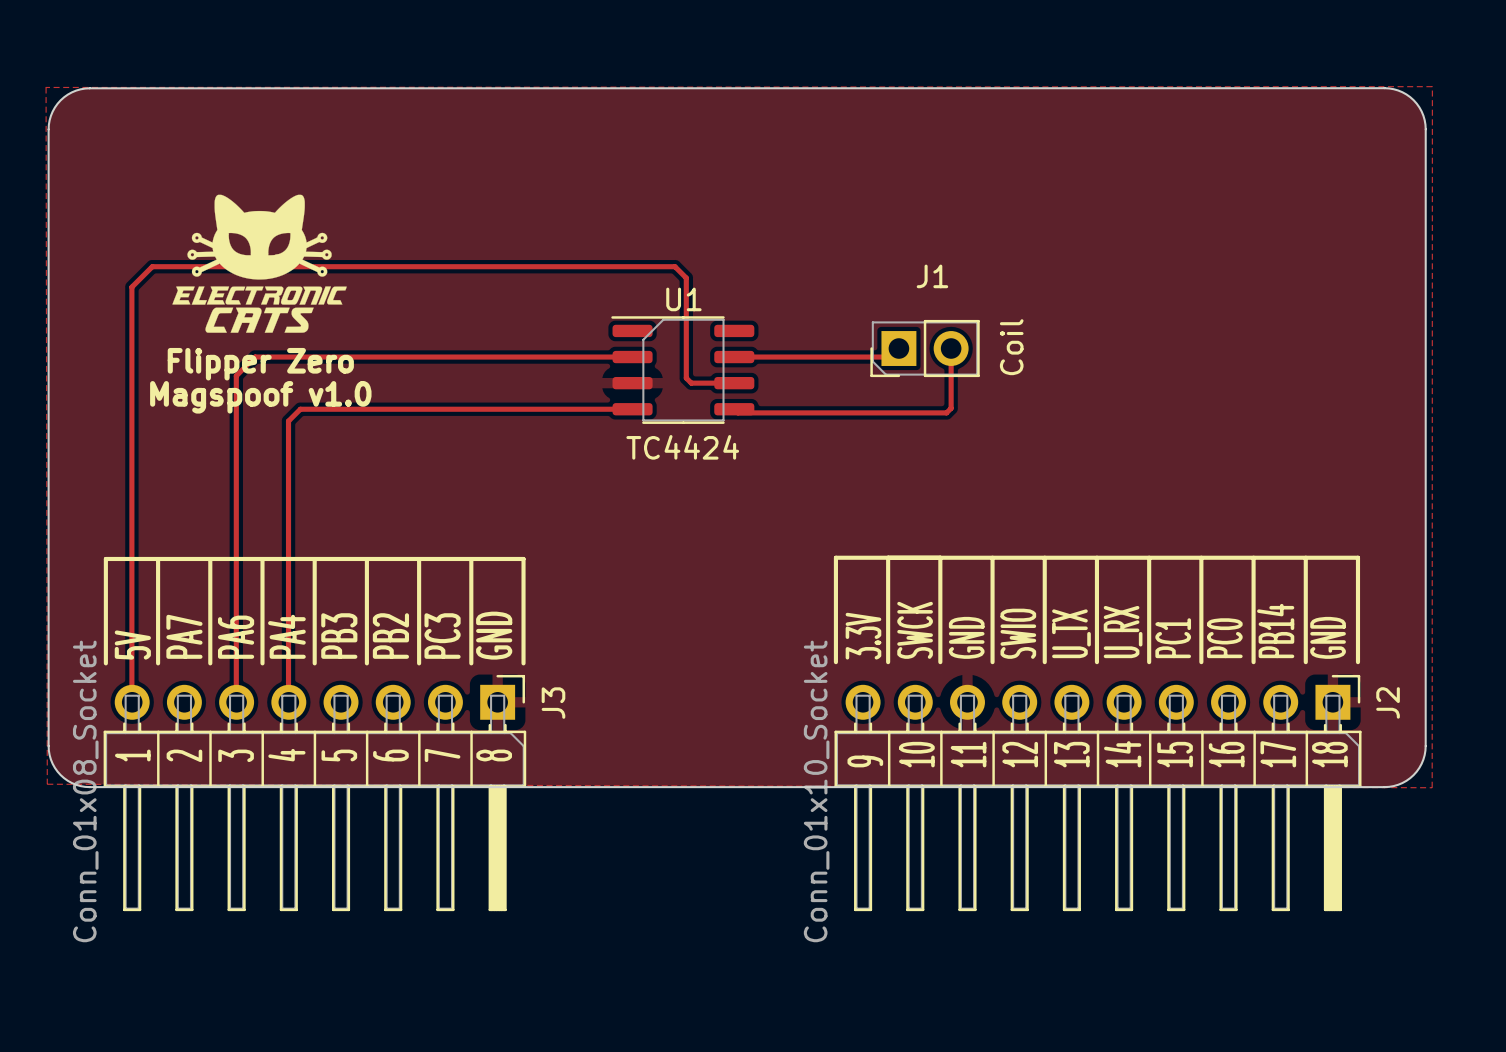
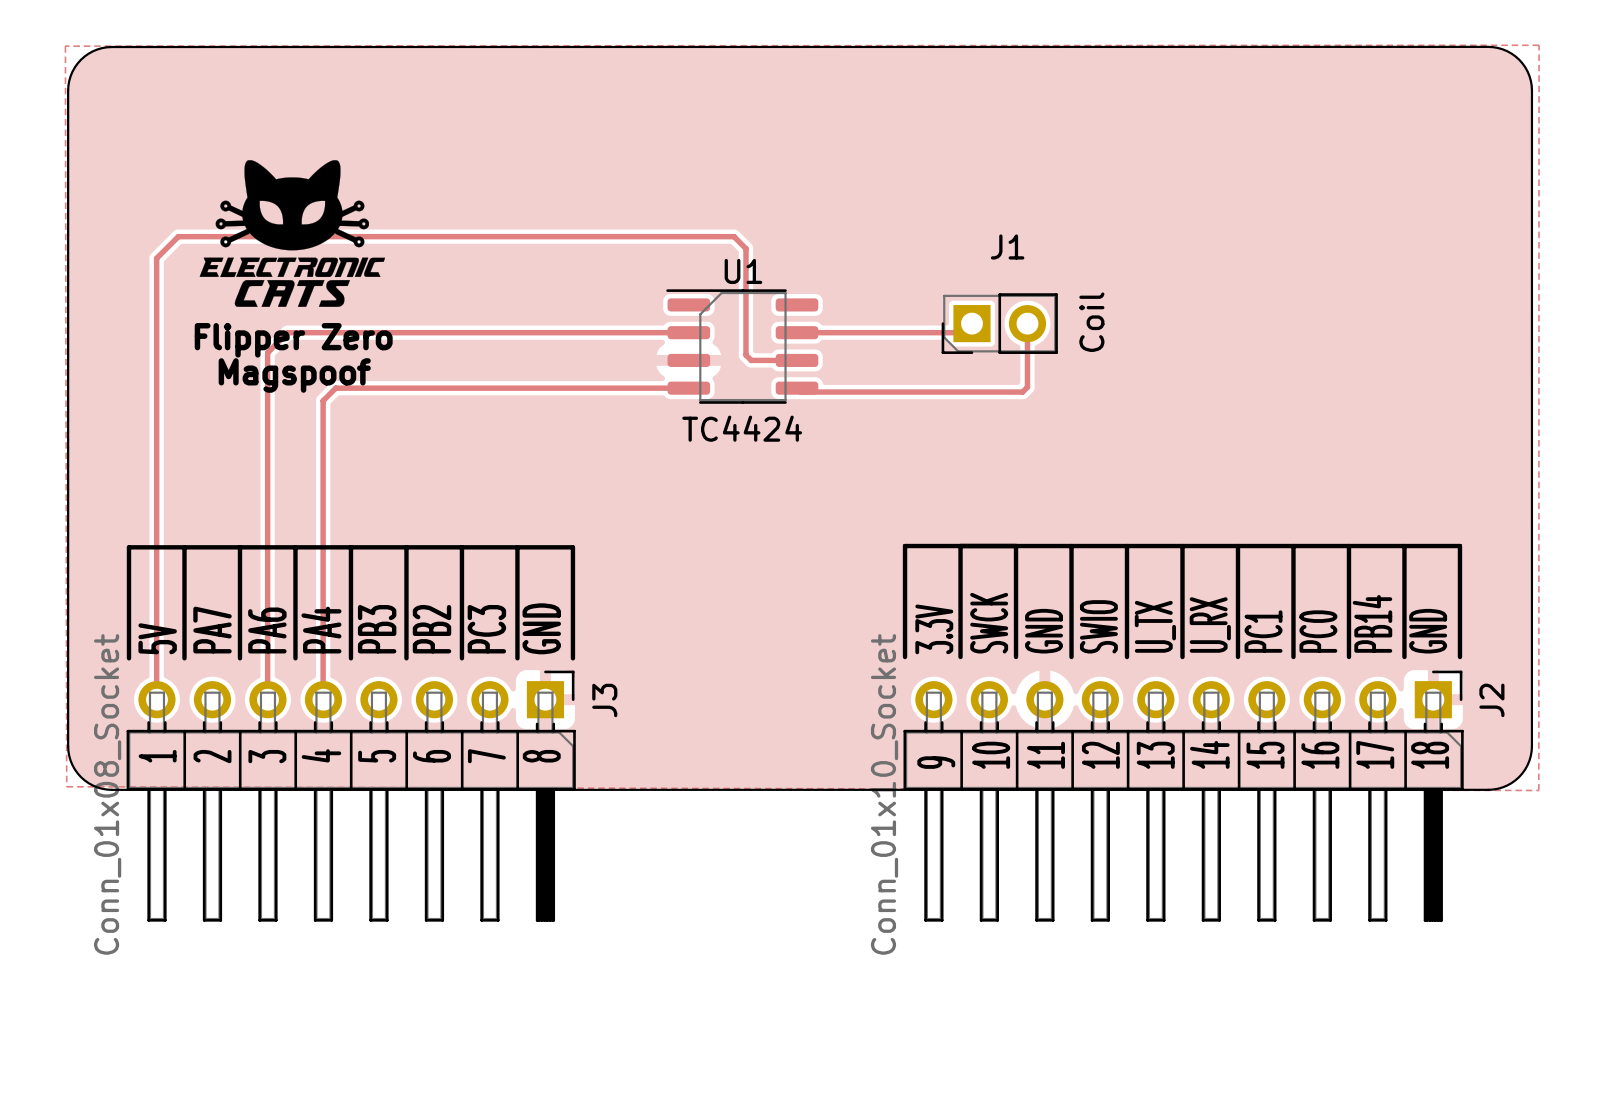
text: Magspoof v1.0 (260, 397) -> Magspoof (294, 375)

